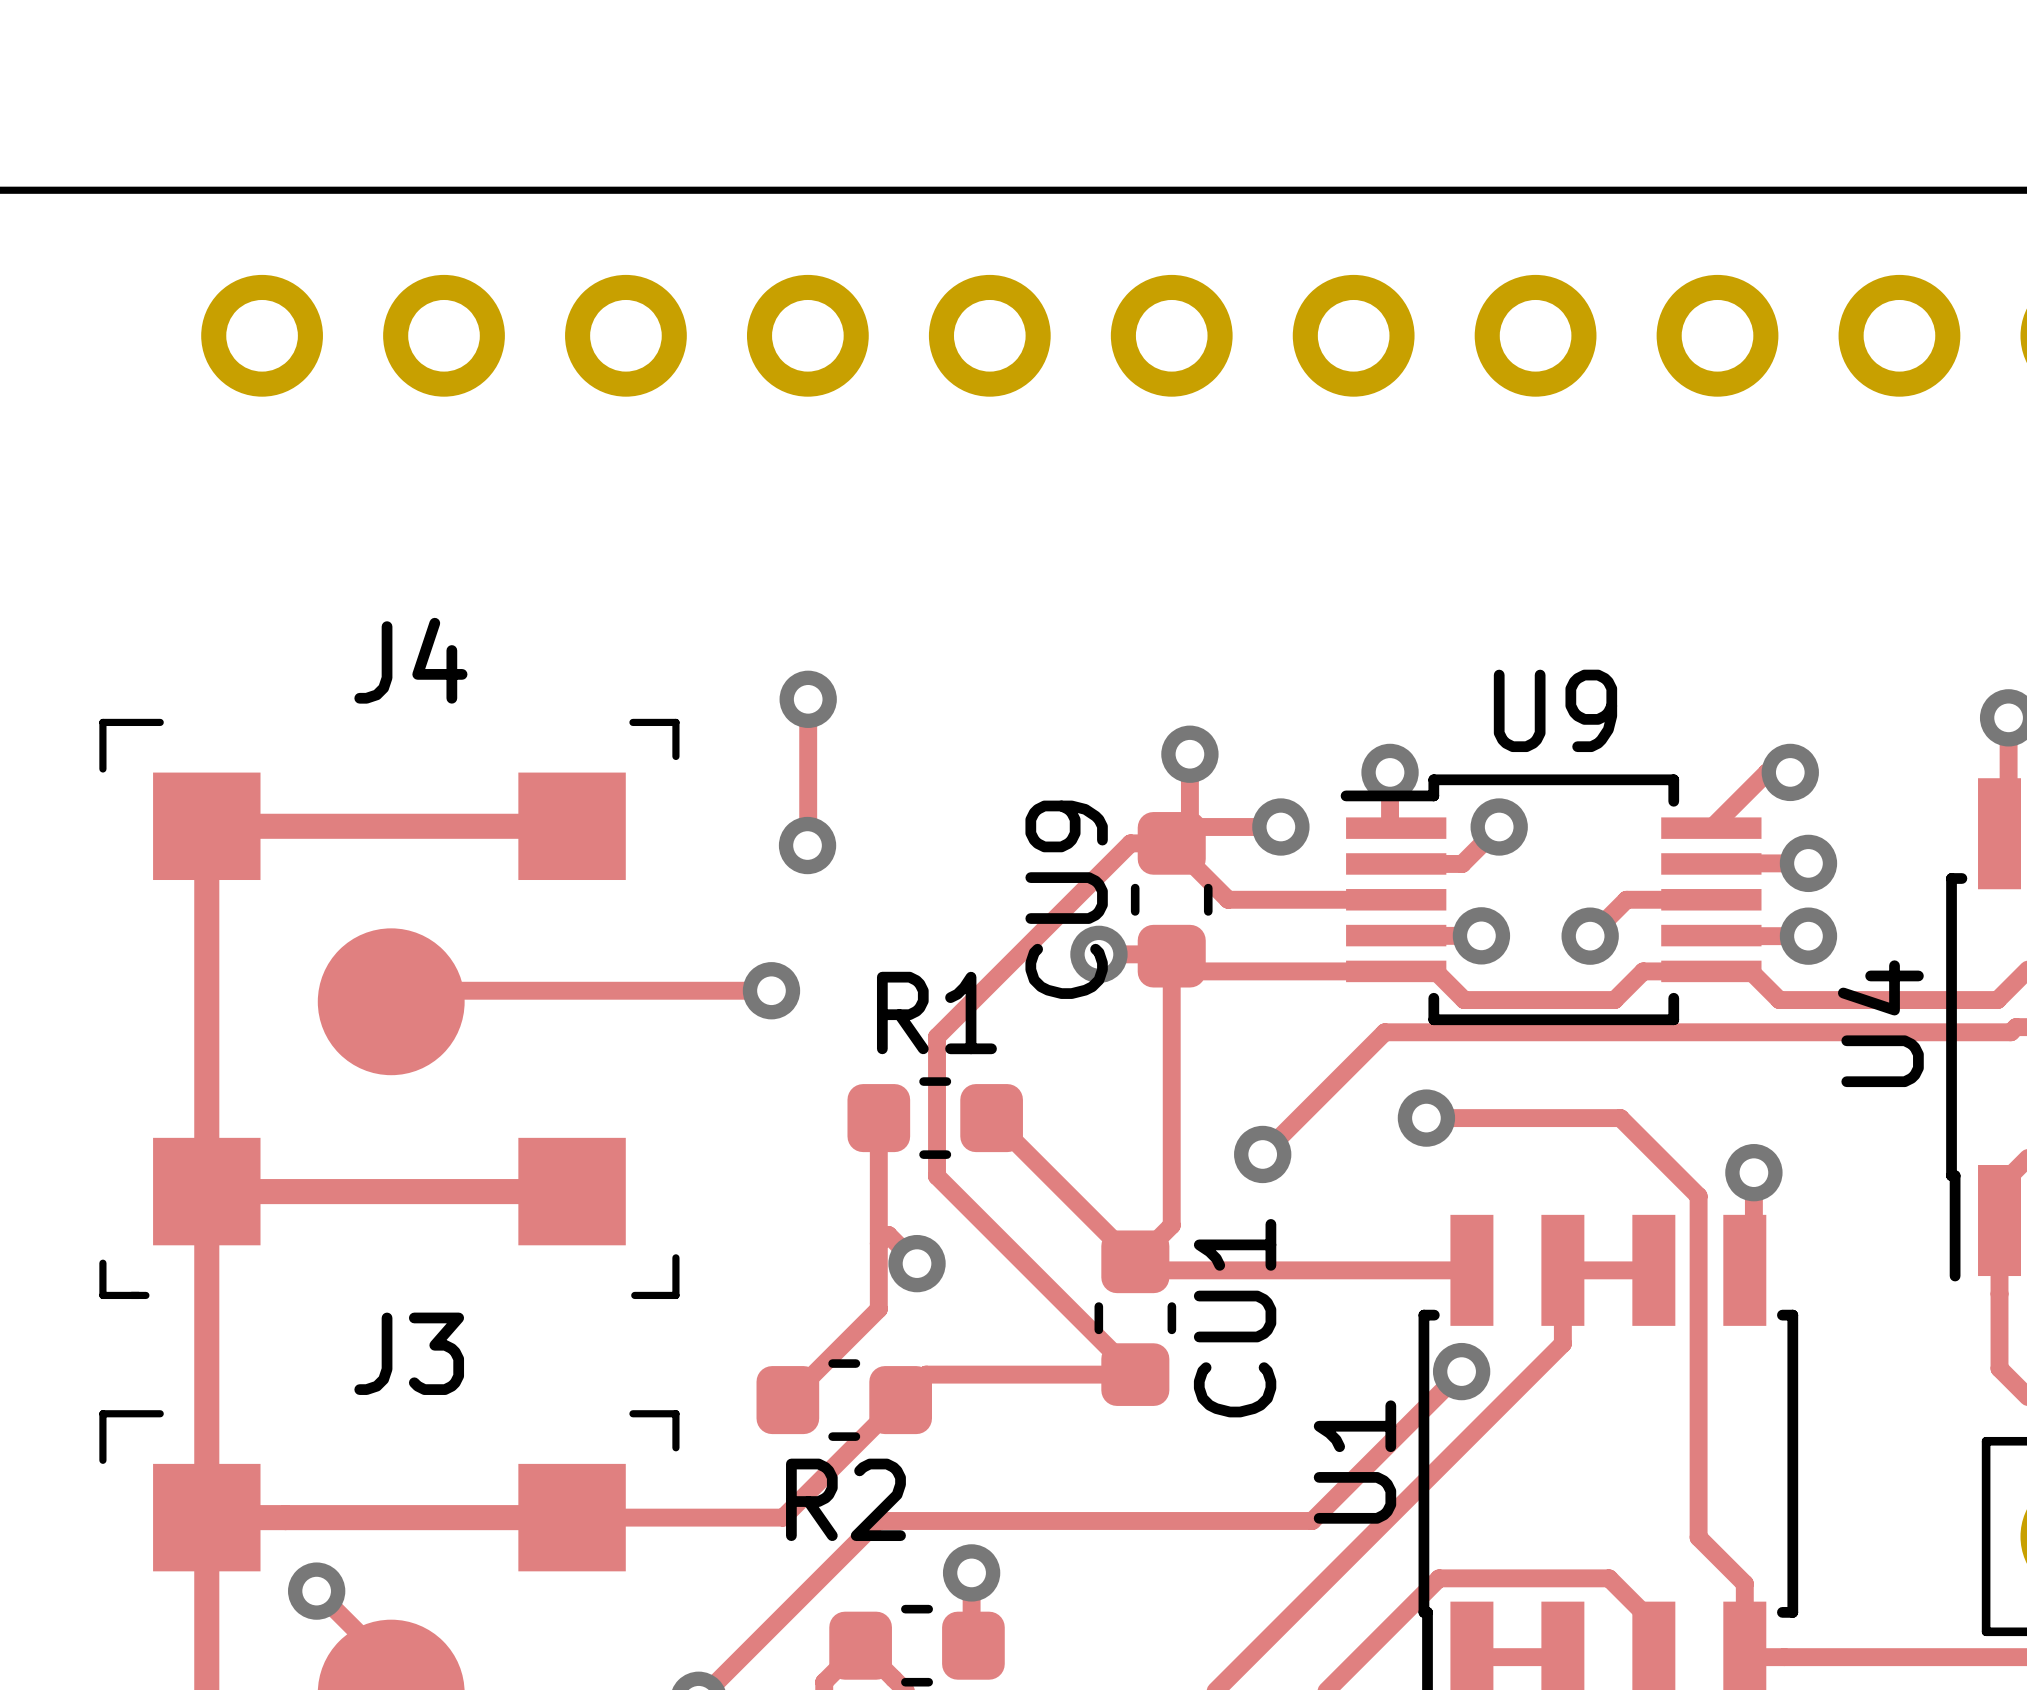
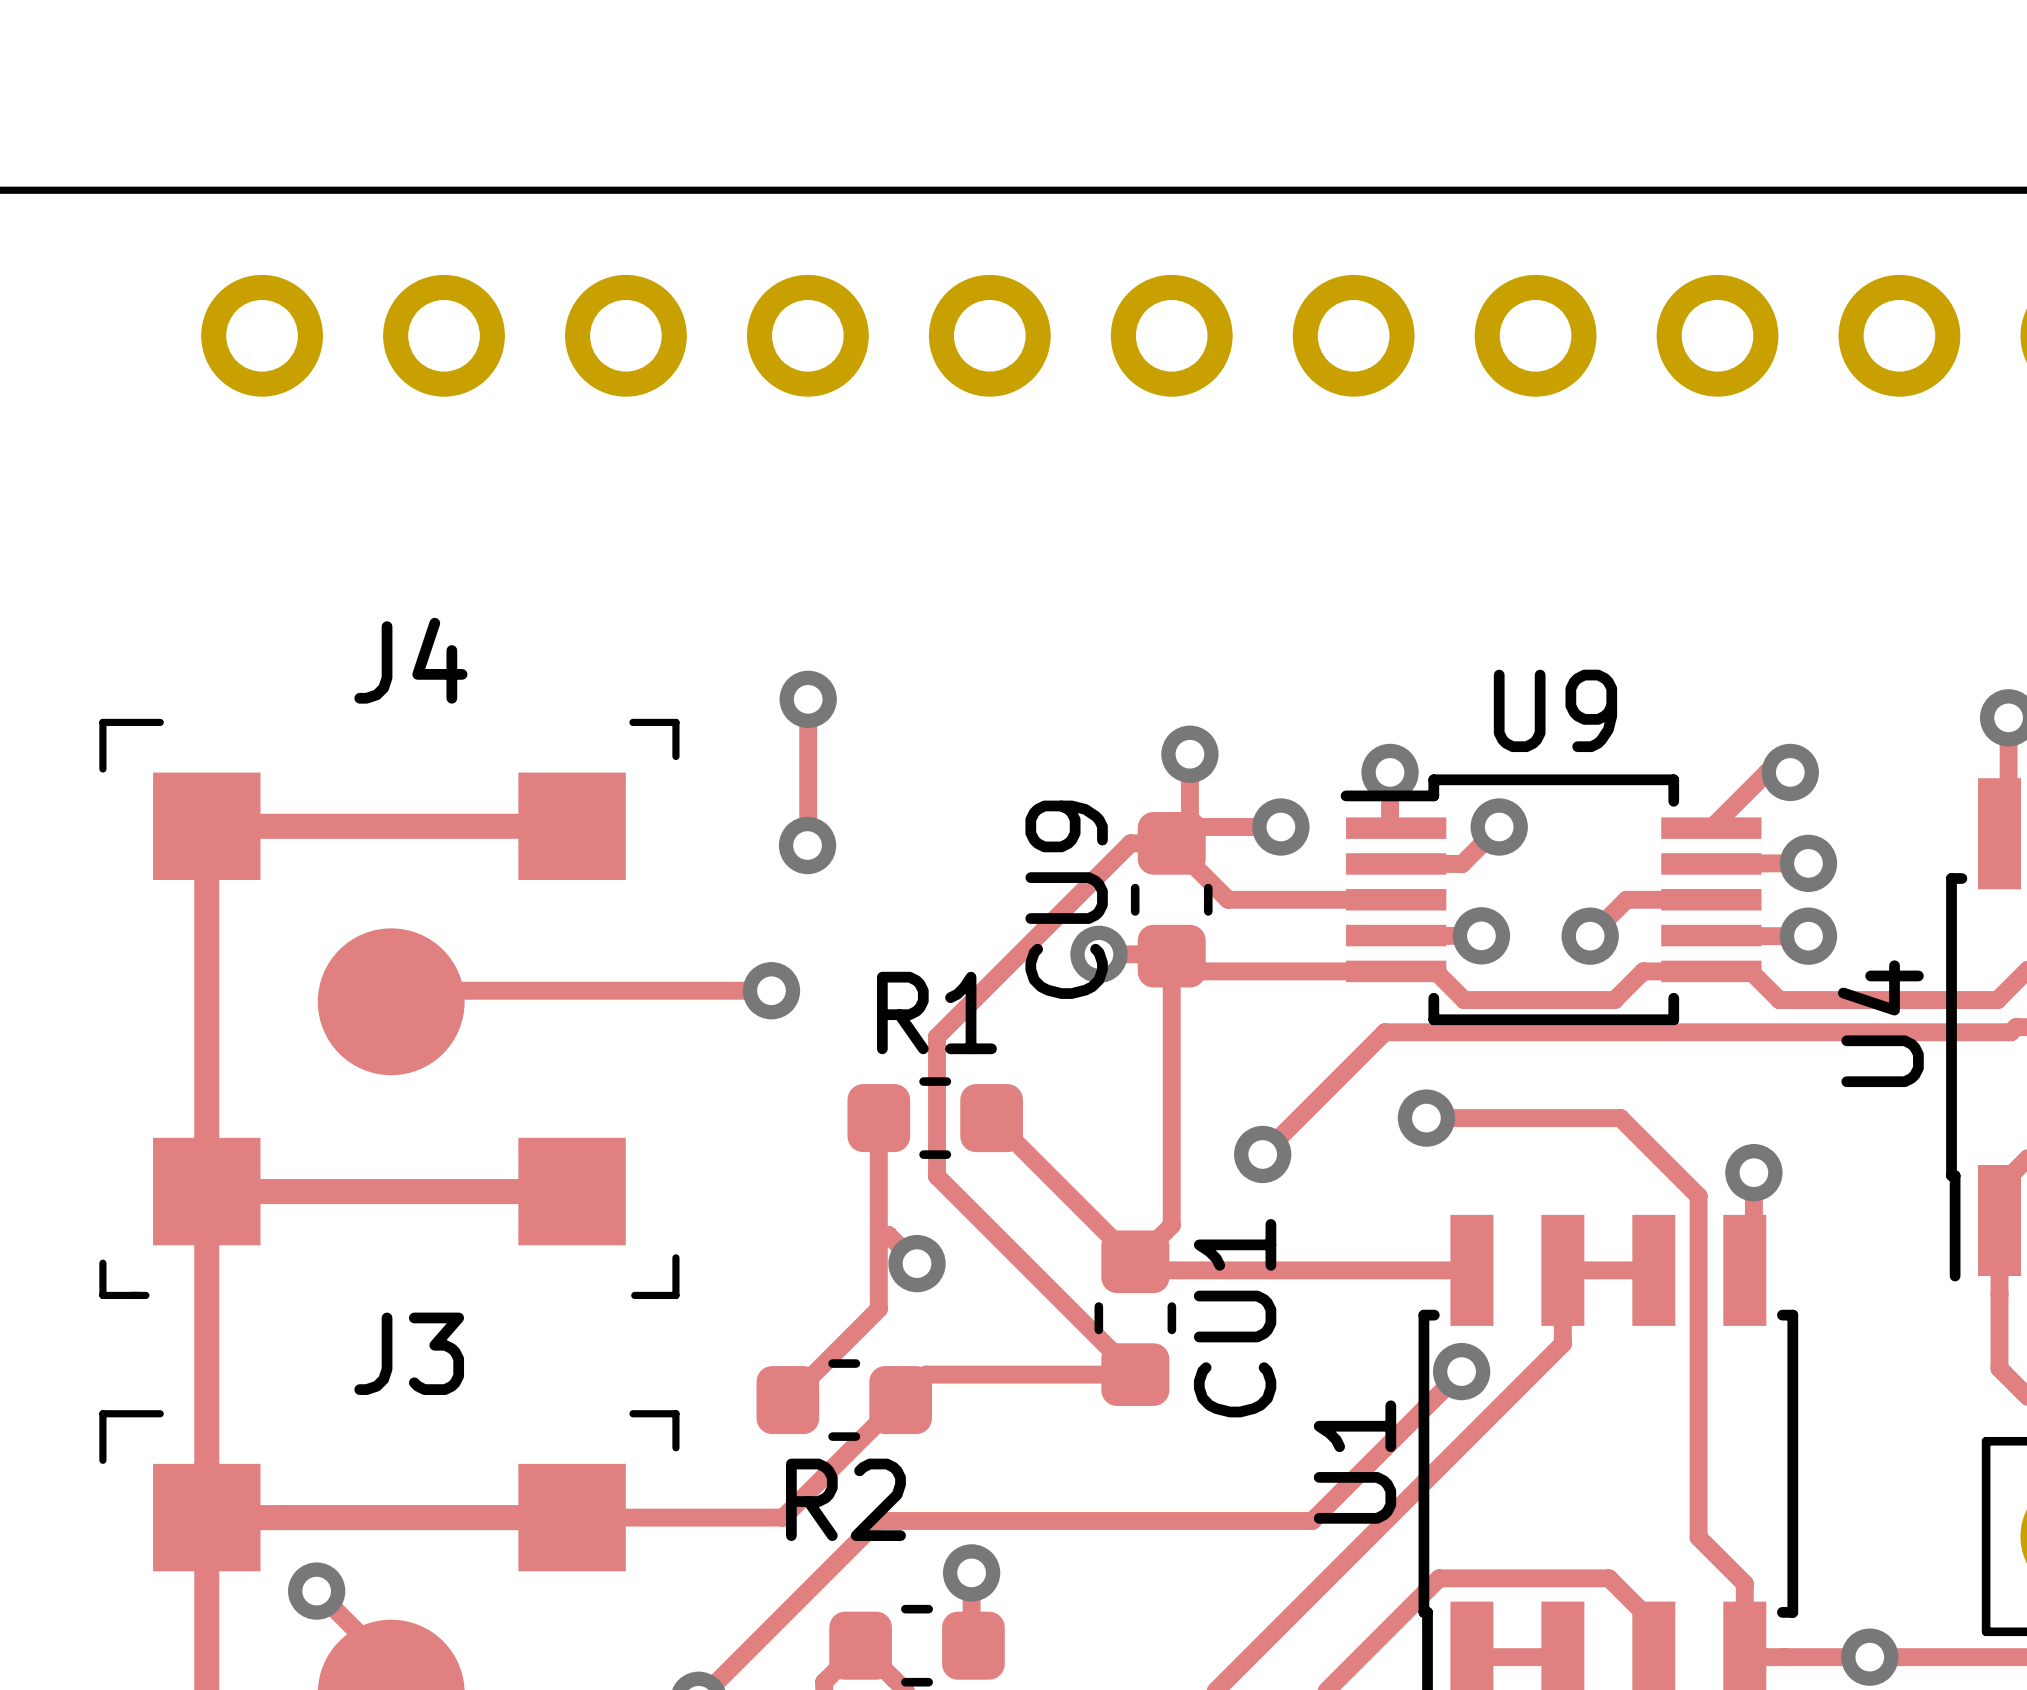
via: none -> (1869, 1657)

